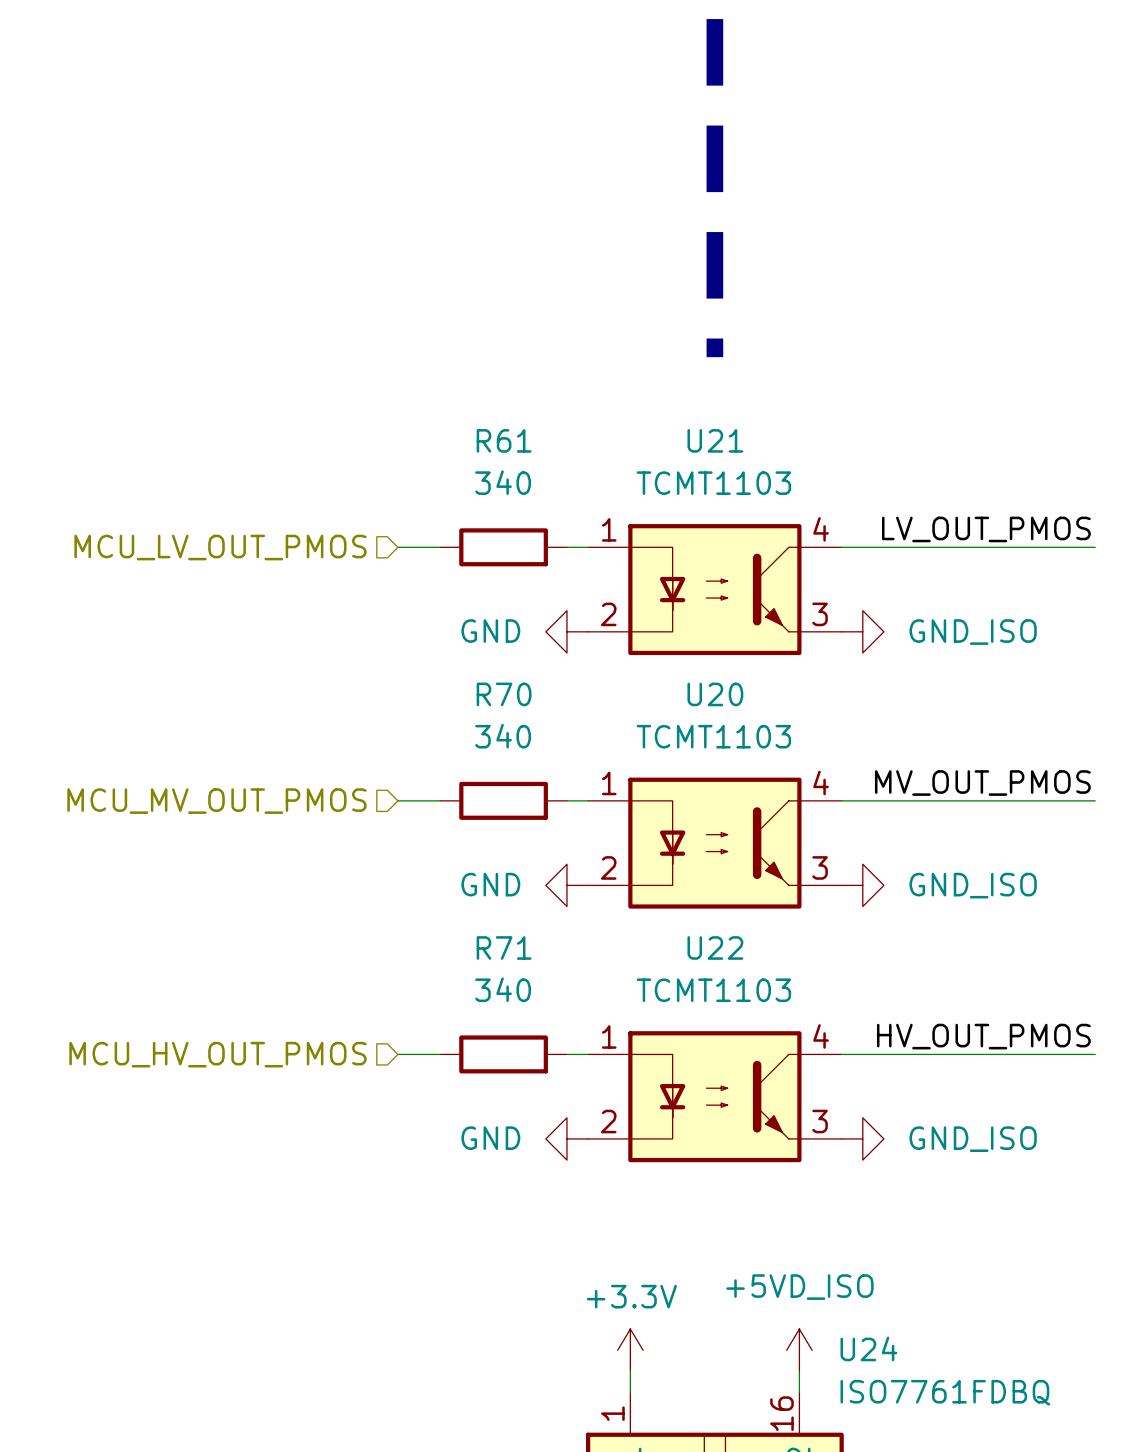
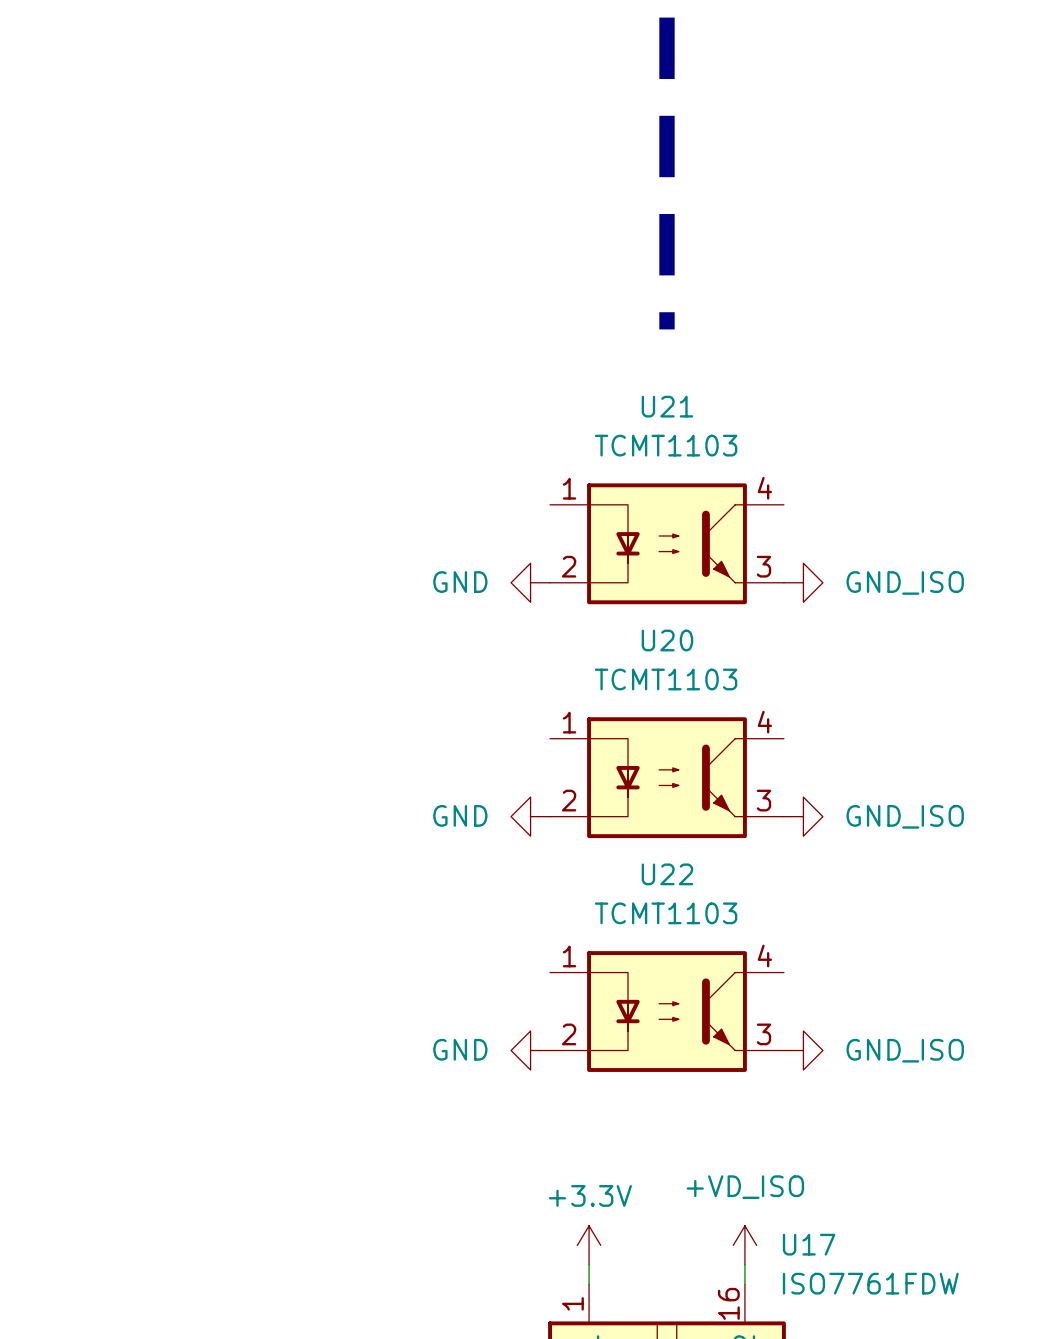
label: LV_OUT_PMOS (986, 529) -> none
hierarchical label: MCU_LV_OUT_PMOS (220, 547) -> none
wire: (397, 547) (440, 547) -> none
R61: 340 (503, 547) -> none
wire: (566, 547) (588, 547) -> none
wire: (841, 547) (1095, 547) -> none
label: MV_OUT_PMOS (982, 783) -> none
wire: (397, 800) (440, 800) -> none
R70: 340 (503, 800) -> none
wire: (566, 800) (588, 800) -> none
wire: (841, 800) (1095, 800) -> none
hierarchical label: MCU_MV_OUT_PMOS (217, 801) -> none
label: HV_OUT_PMOS (983, 1036) -> none
hierarchical label: MCU_HV_OUT_PMOS (218, 1054) -> none
wire: (397, 1054) (440, 1054) -> none
R71: 340 (503, 1054) -> none
wire: (566, 1054) (588, 1054) -> none
wire: (841, 1054) (1095, 1054) -> none
U24 name: U24 (868, 1348) -> U17 (809, 1244)
power symbol: +5VD_ISO (799, 1350) -> +VD_ISO (744, 1245)
U24 value: ISO7761FDBQ (945, 1392) -> ISO7761FDW (870, 1283)

